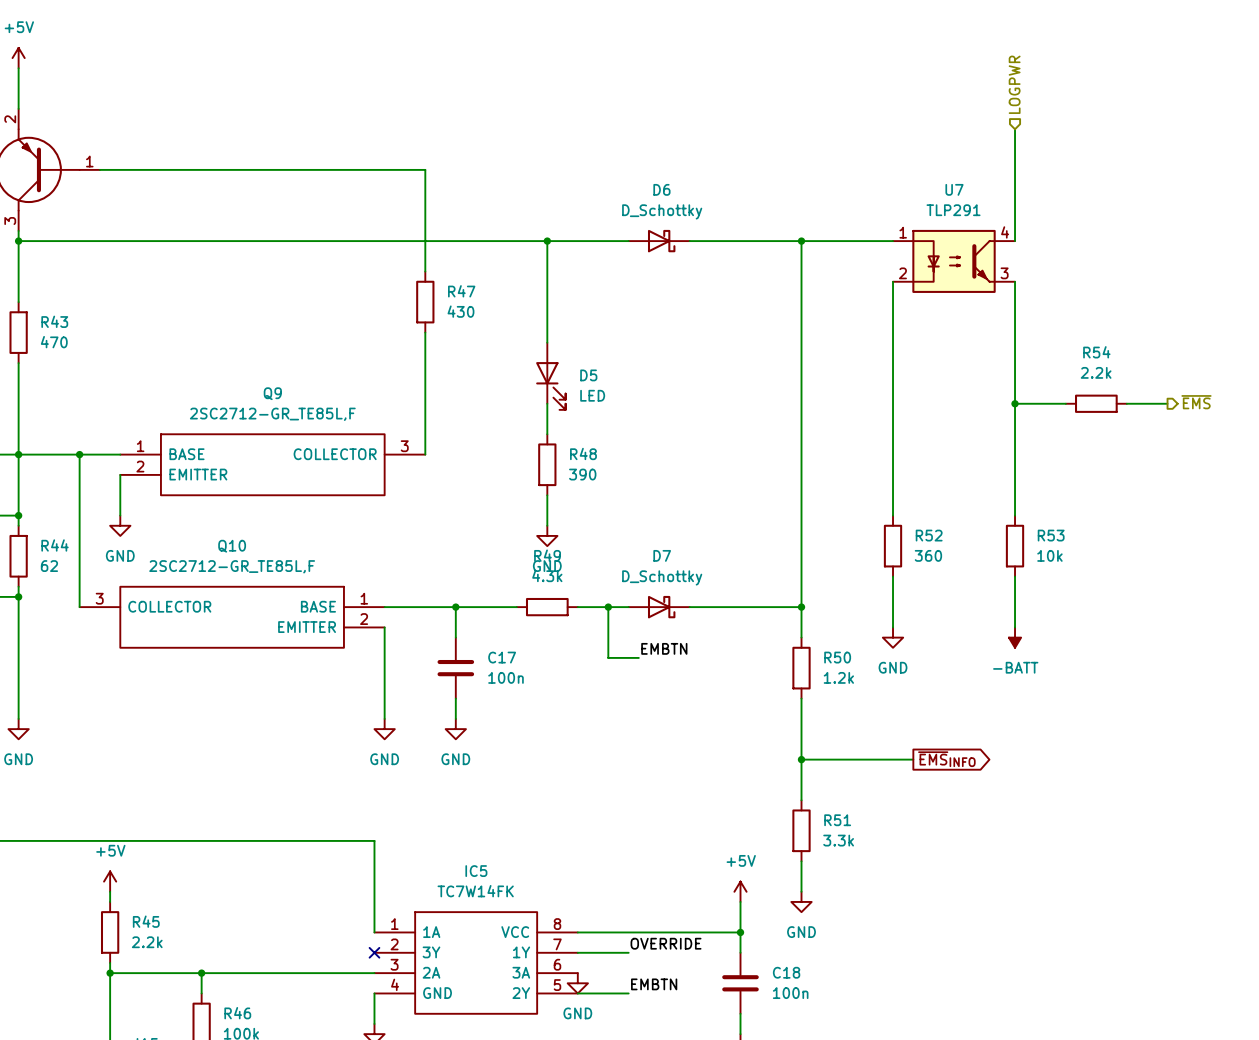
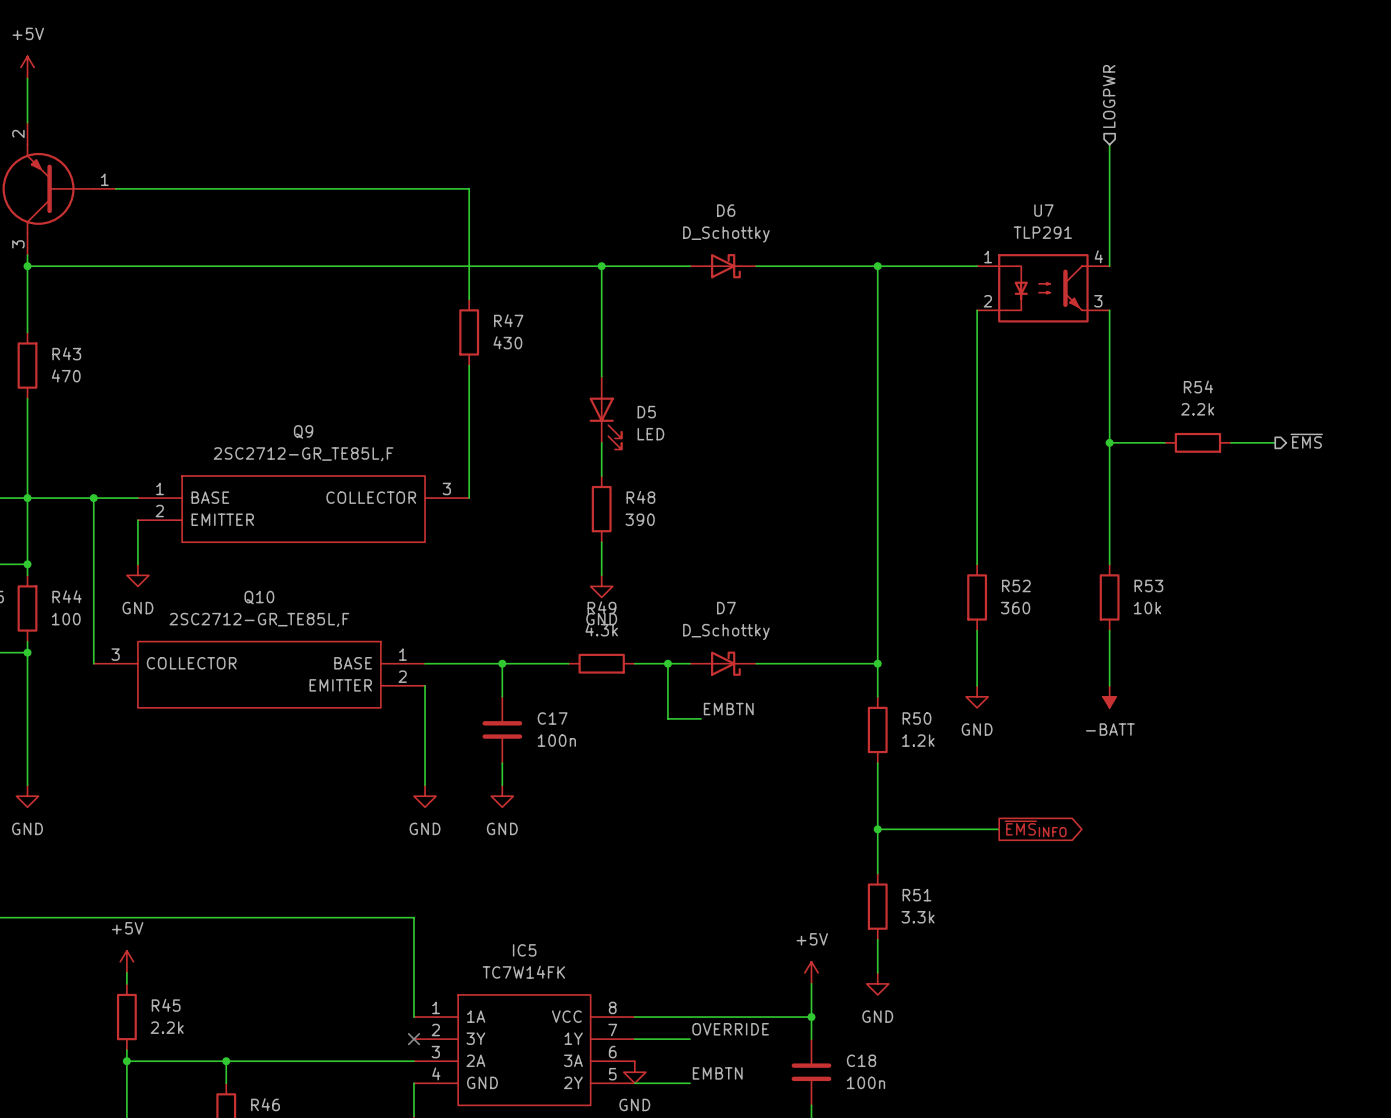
R44 value: 62 (49, 566) -> 100 (66, 619)

